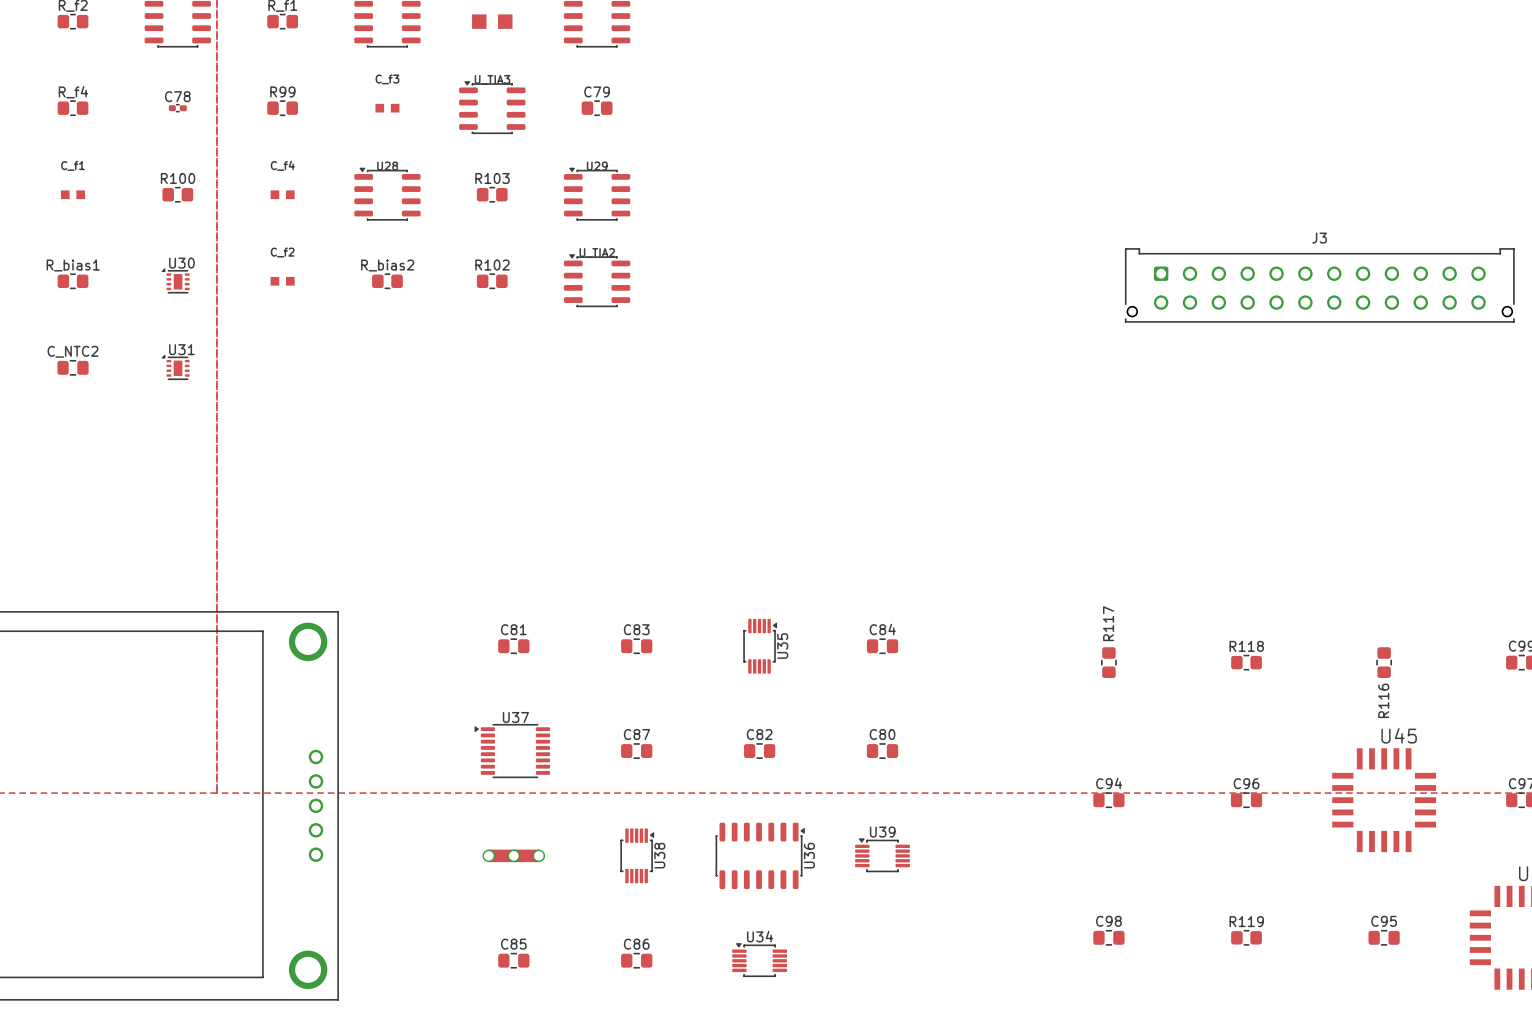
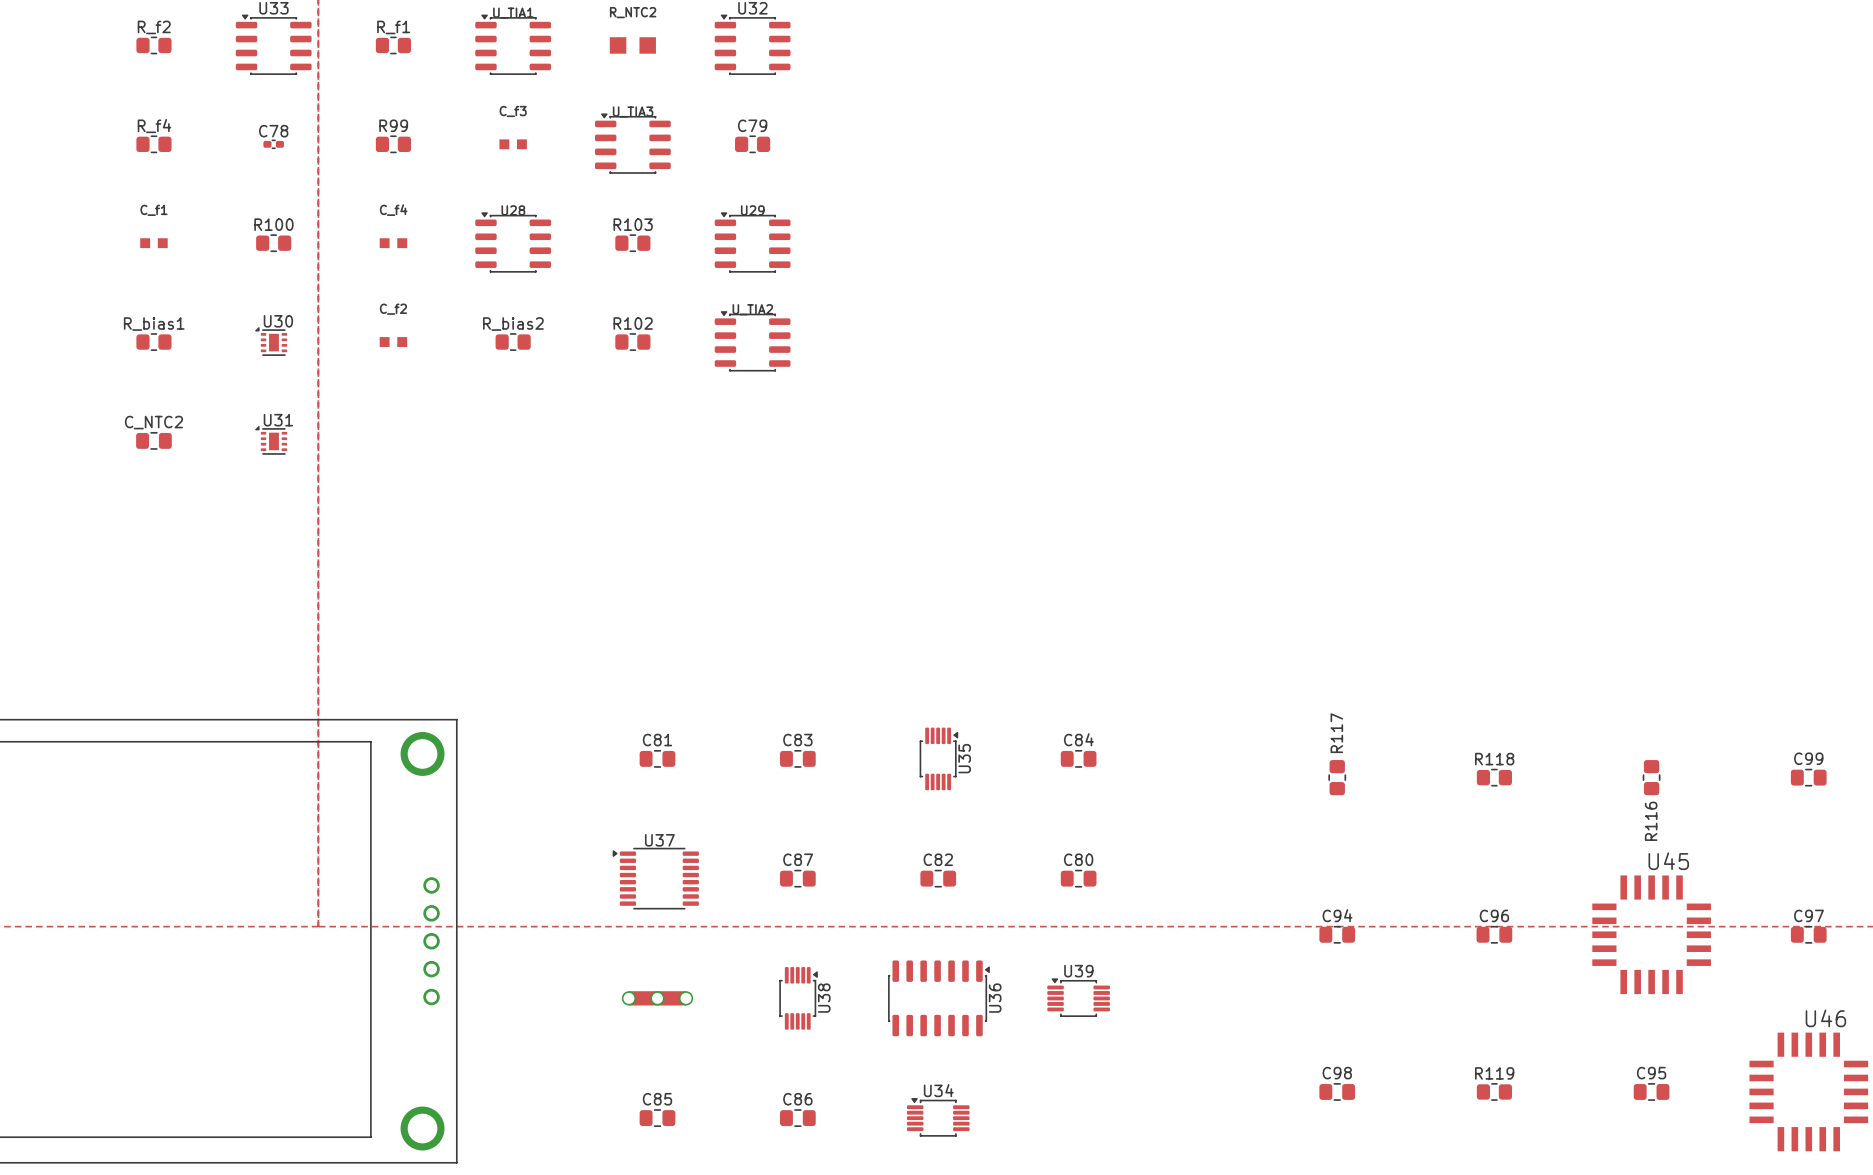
J3: (1319, 285) -> none

